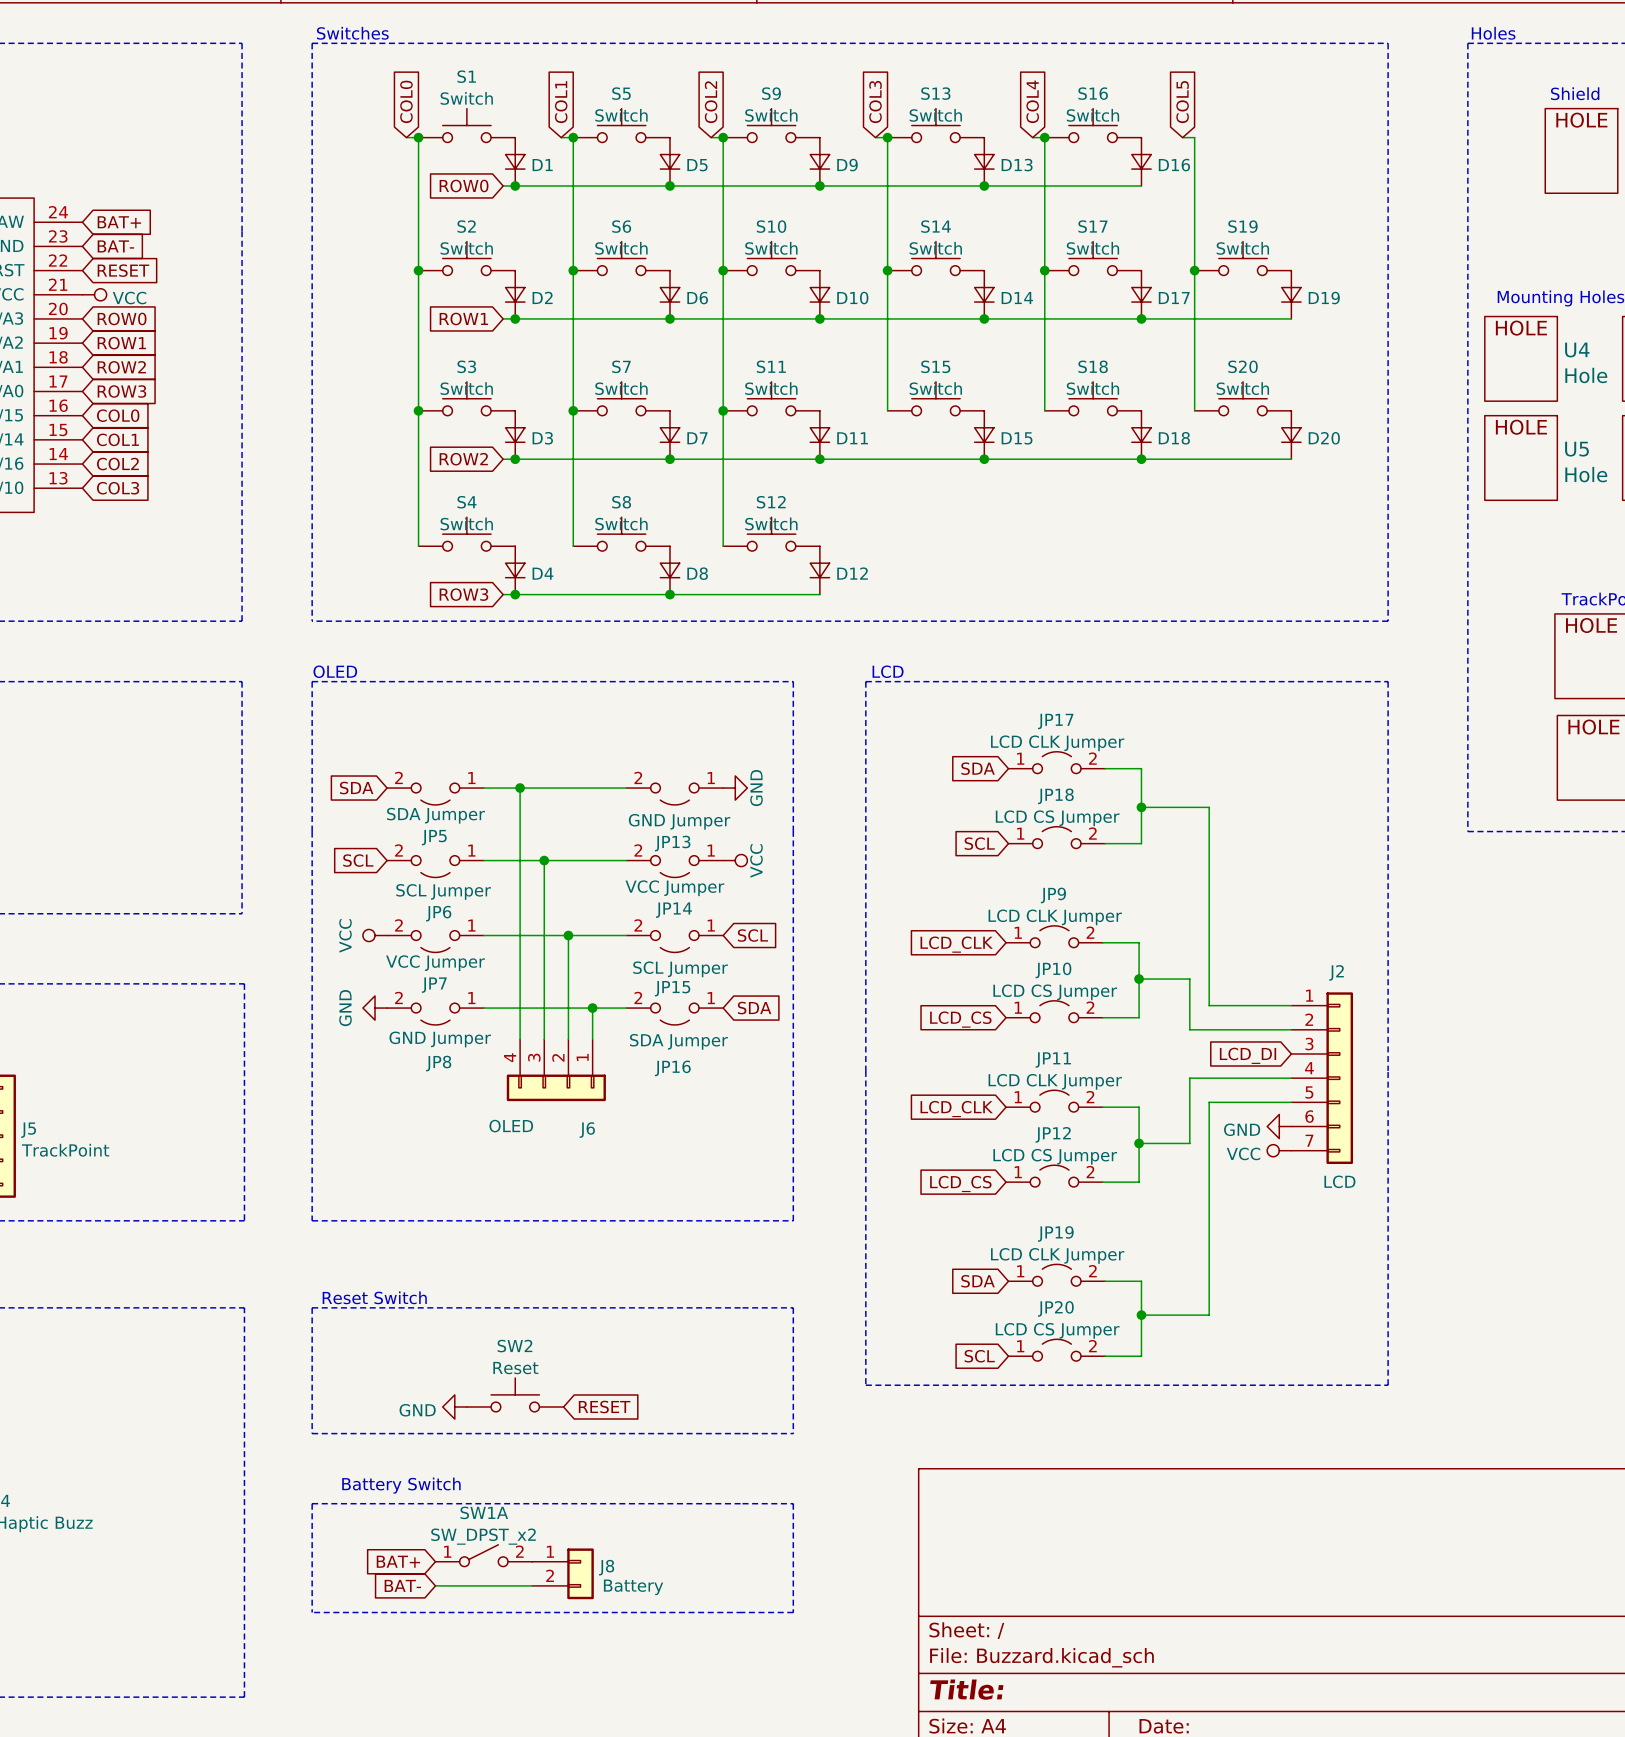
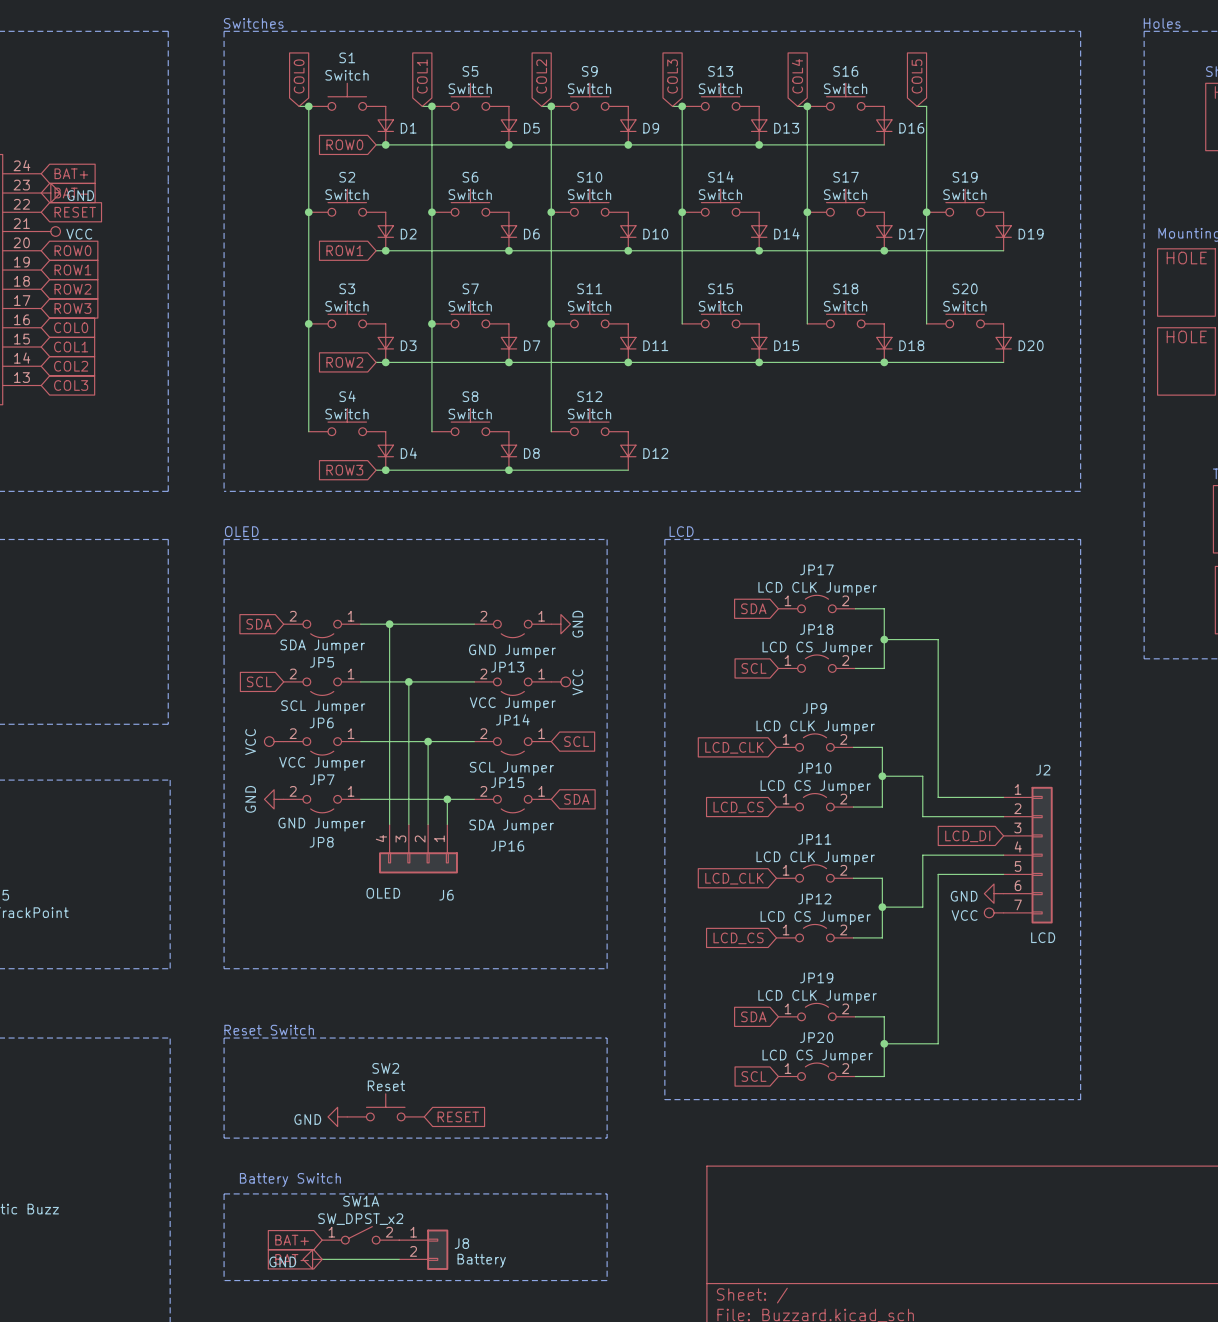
power symbol: none -> GND (50, 193)
power symbol: none -> GND (312, 1259)

